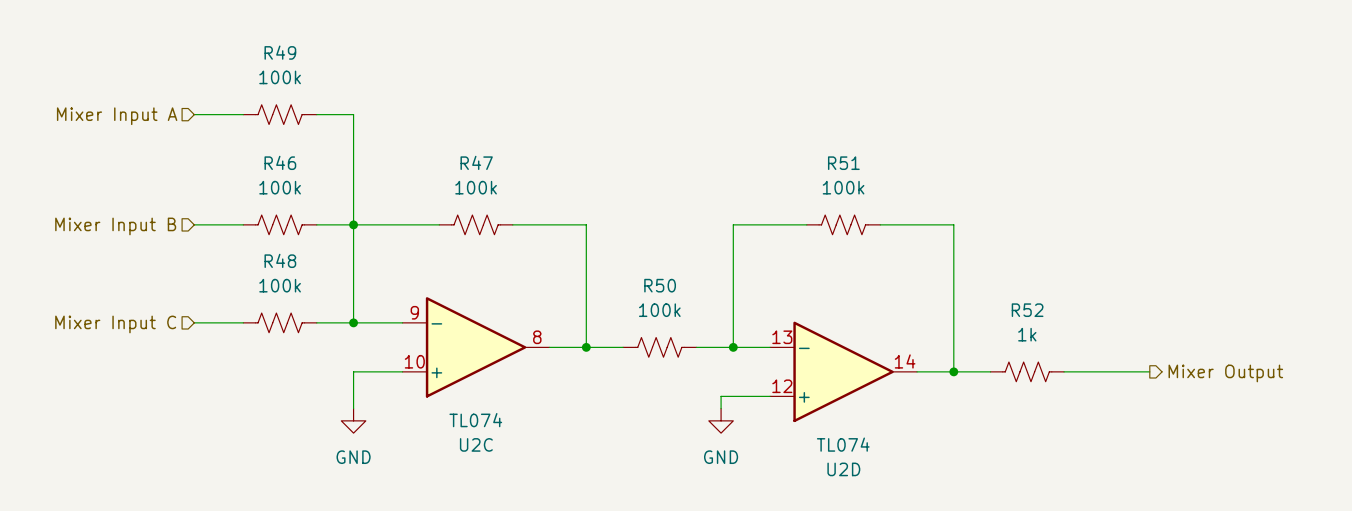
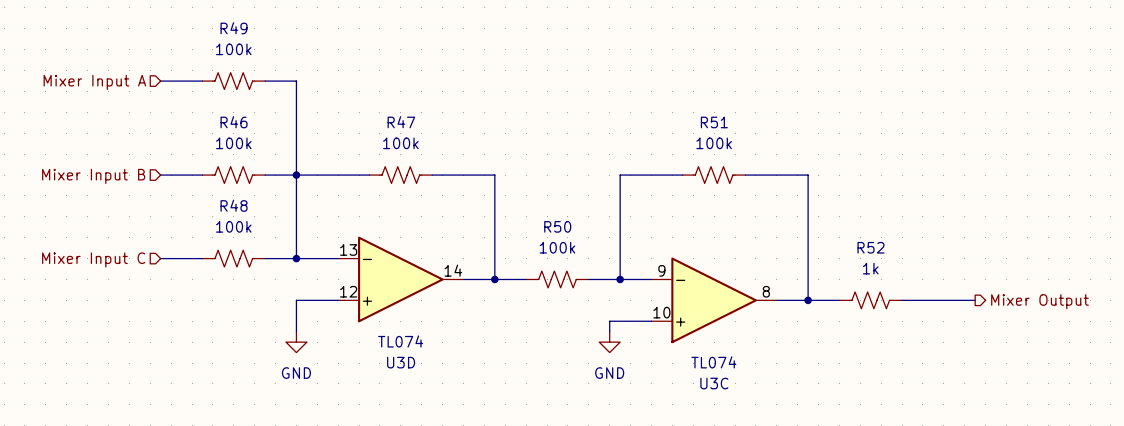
U2C pin number: 9 (414, 312) -> 13 (348, 249)
U2C pin number: 8 (537, 337) -> 14 (453, 270)
U2D pin number: 13 (782, 337) -> 9 (661, 270)
U2C pin number: 10 (414, 361) -> 12 (348, 291)
U2D pin number: 14 (905, 361) -> 8 (766, 291)
U2D pin number: 12 (782, 386) -> 10 (661, 312)
U2C name: U2C (476, 444) -> U3D (401, 362)
U2D name: U2D (843, 469) -> U3C (714, 383)

